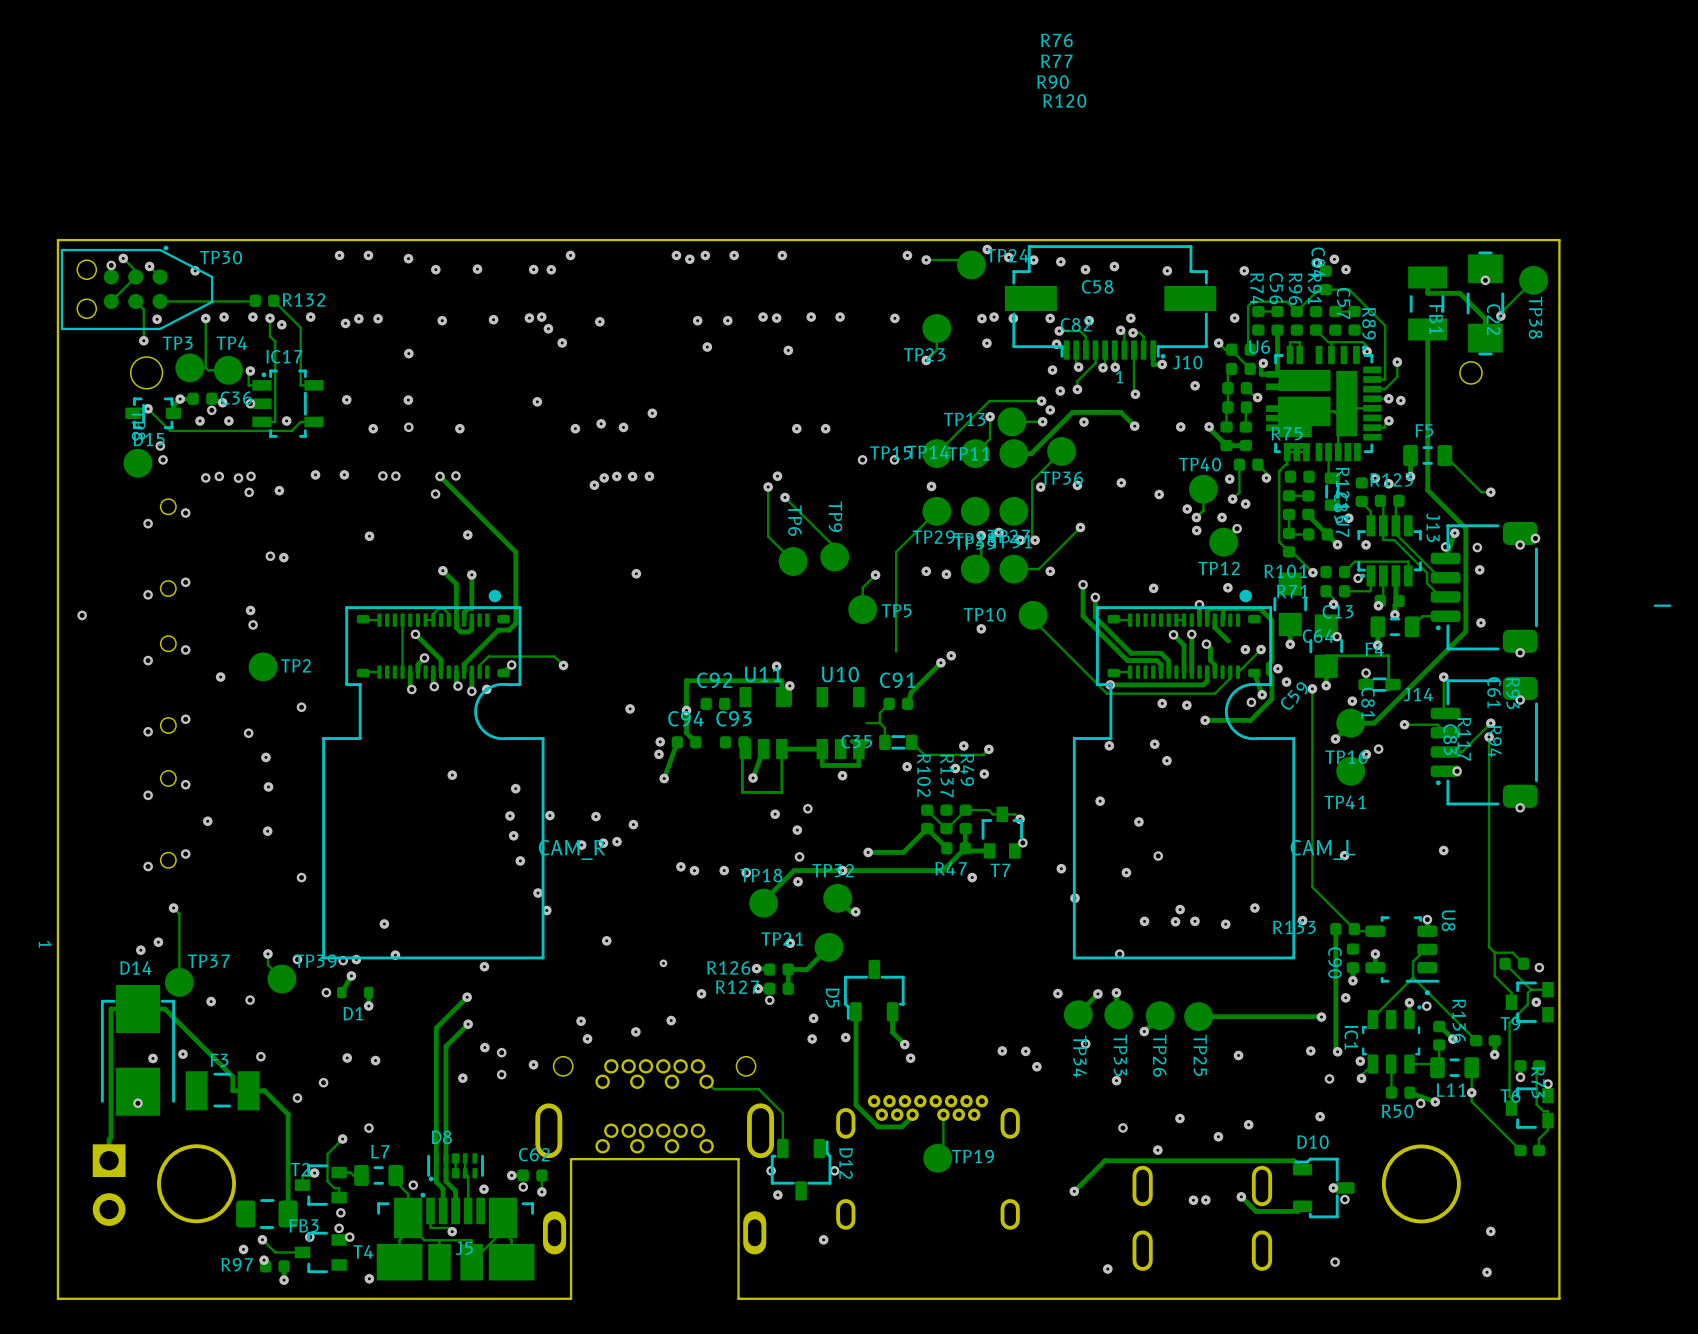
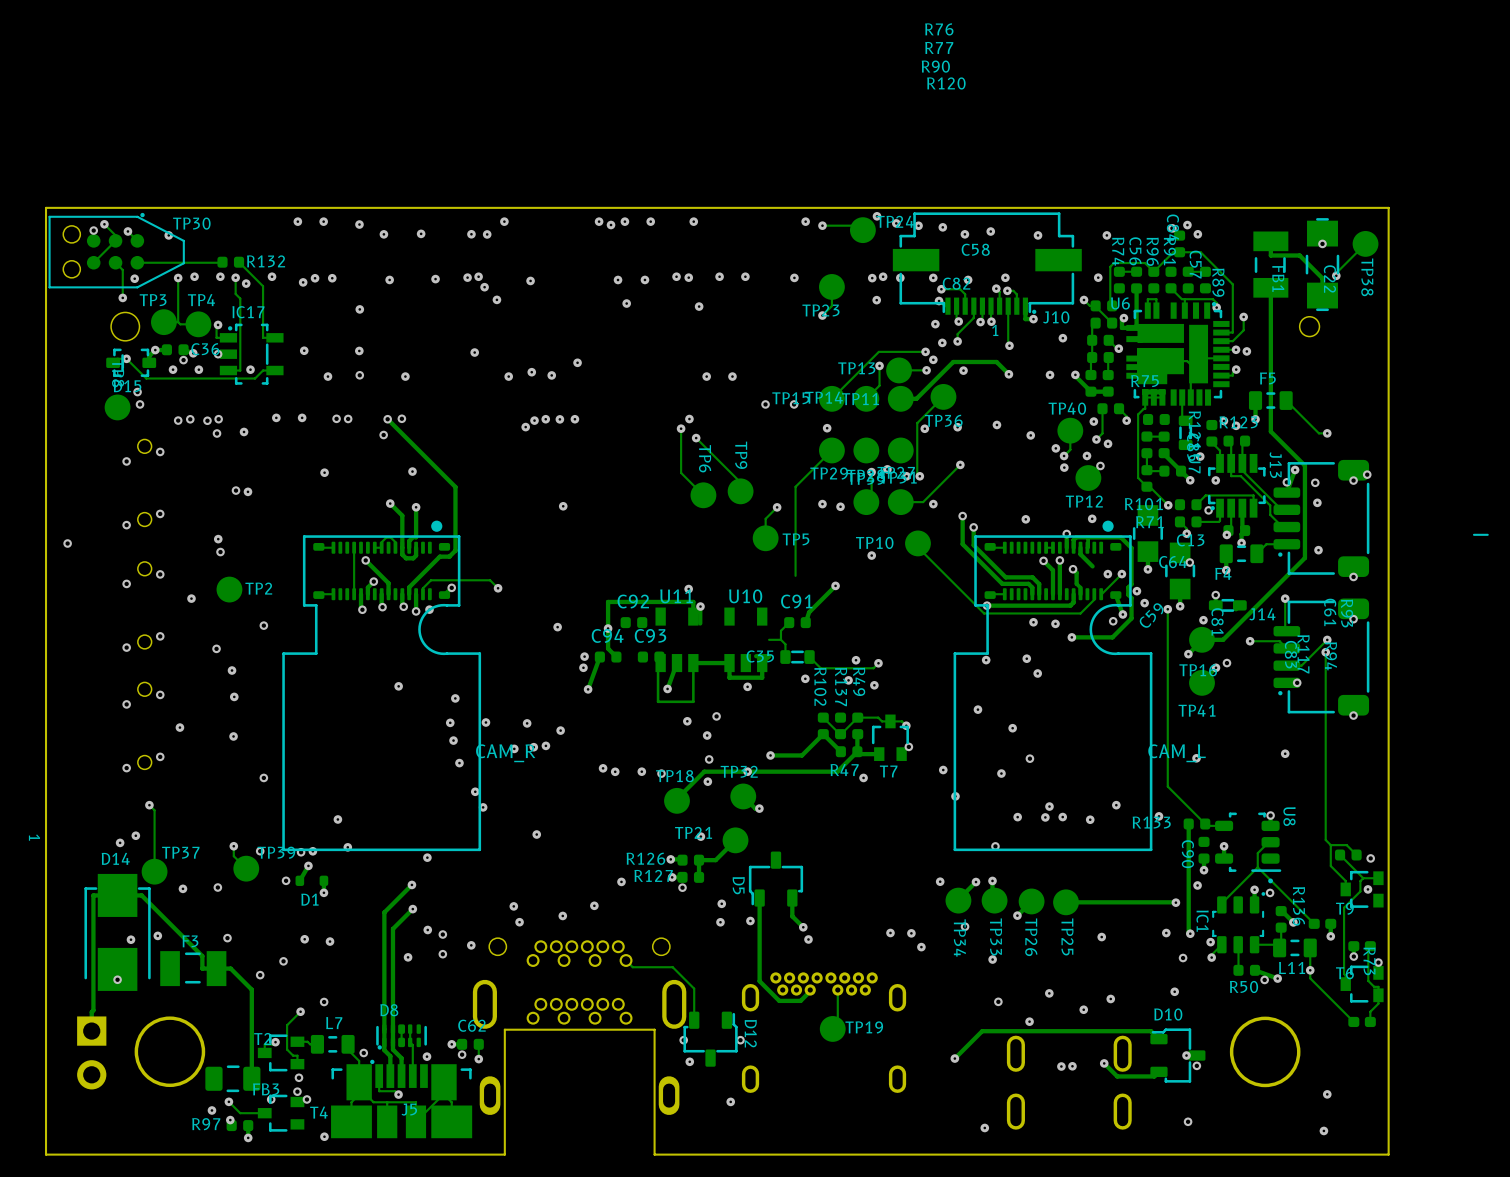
via: (951, 655) -> none
track: (1326, 666) (1326, 655) (1388, 655) (1388, 688) -> none
via: (663, 963) -> none

